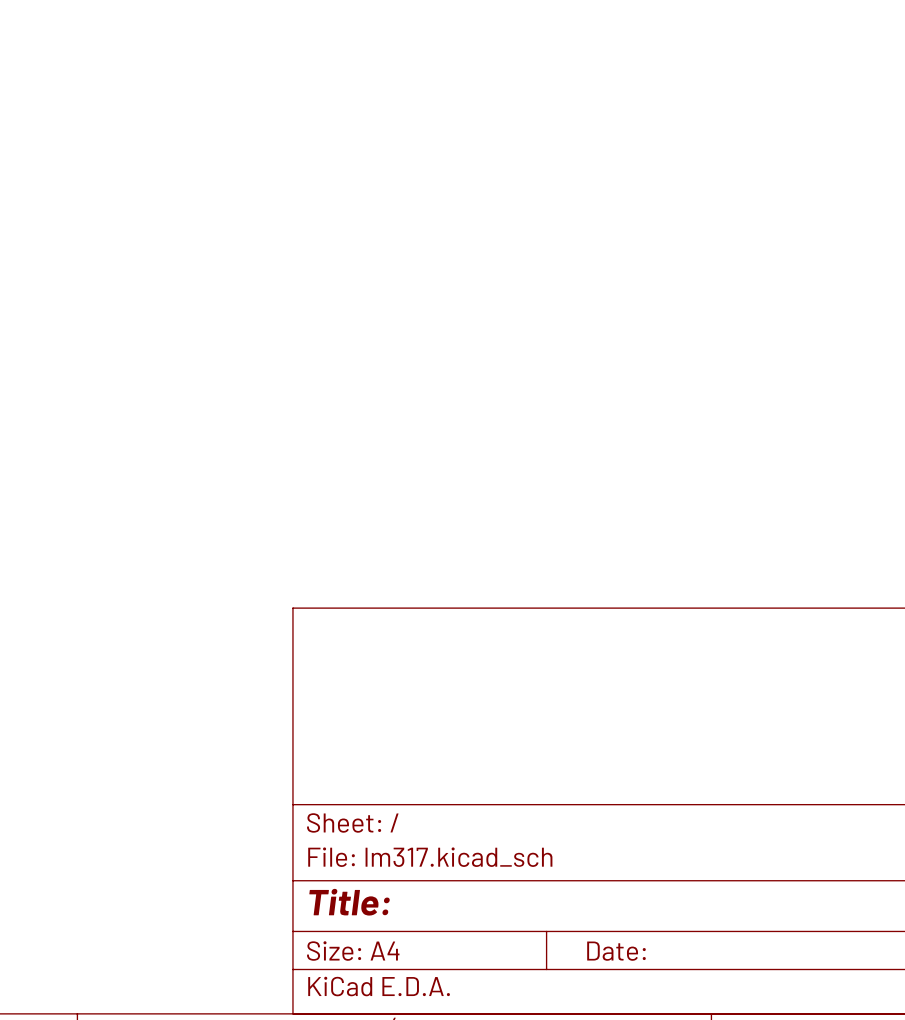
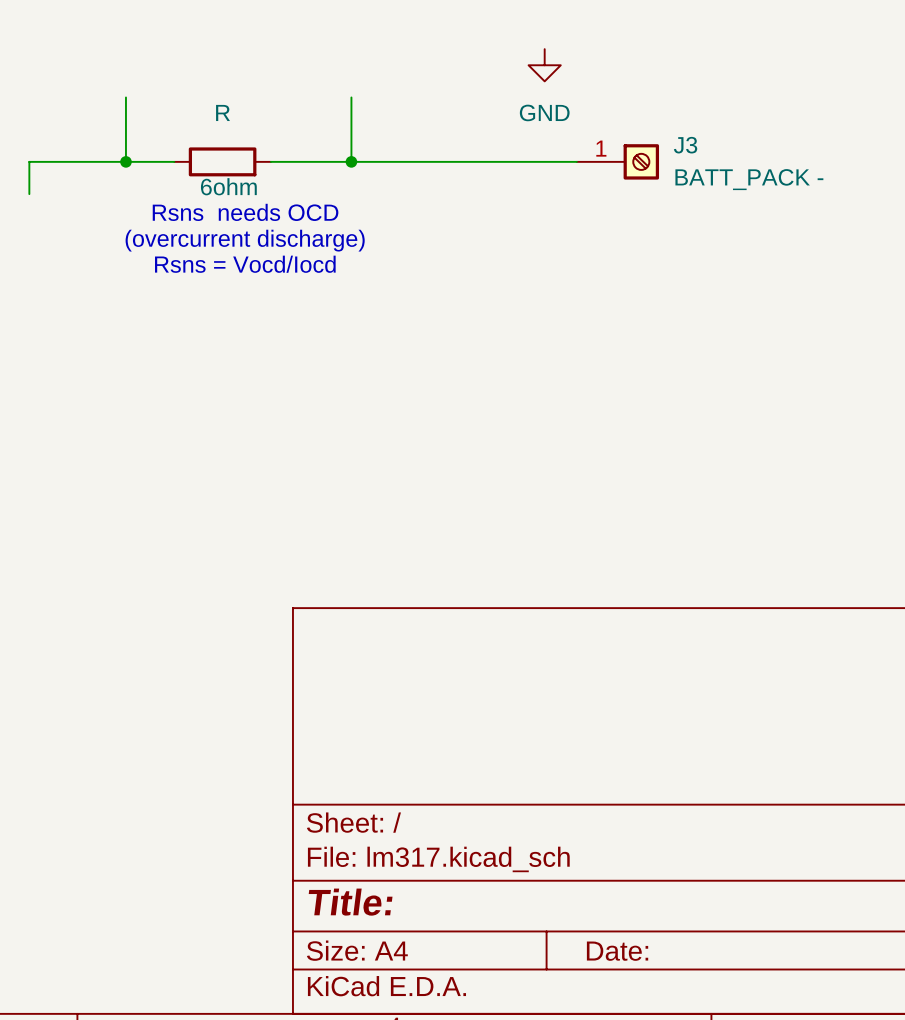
power symbol: none -> GND (544, 65)
wire: none -> (125, 97) (125, 161)
wire: none -> (351, 97) (351, 161)
junction: none -> (125, 161)
wire: none -> (174, 161) (29, 161) (29, 194)
6ohm: none -> R (222, 161)
wire: none -> (270, 161) (576, 161)
junction: none -> (351, 161)
J3: none -> BATT_PACK - (617, 161)
text: none -> Rsns needs OCD (245, 212)
text: none -> (overcurrent discharge) (245, 240)
text: none -> Rsns = Vocd/Iocd (245, 264)

